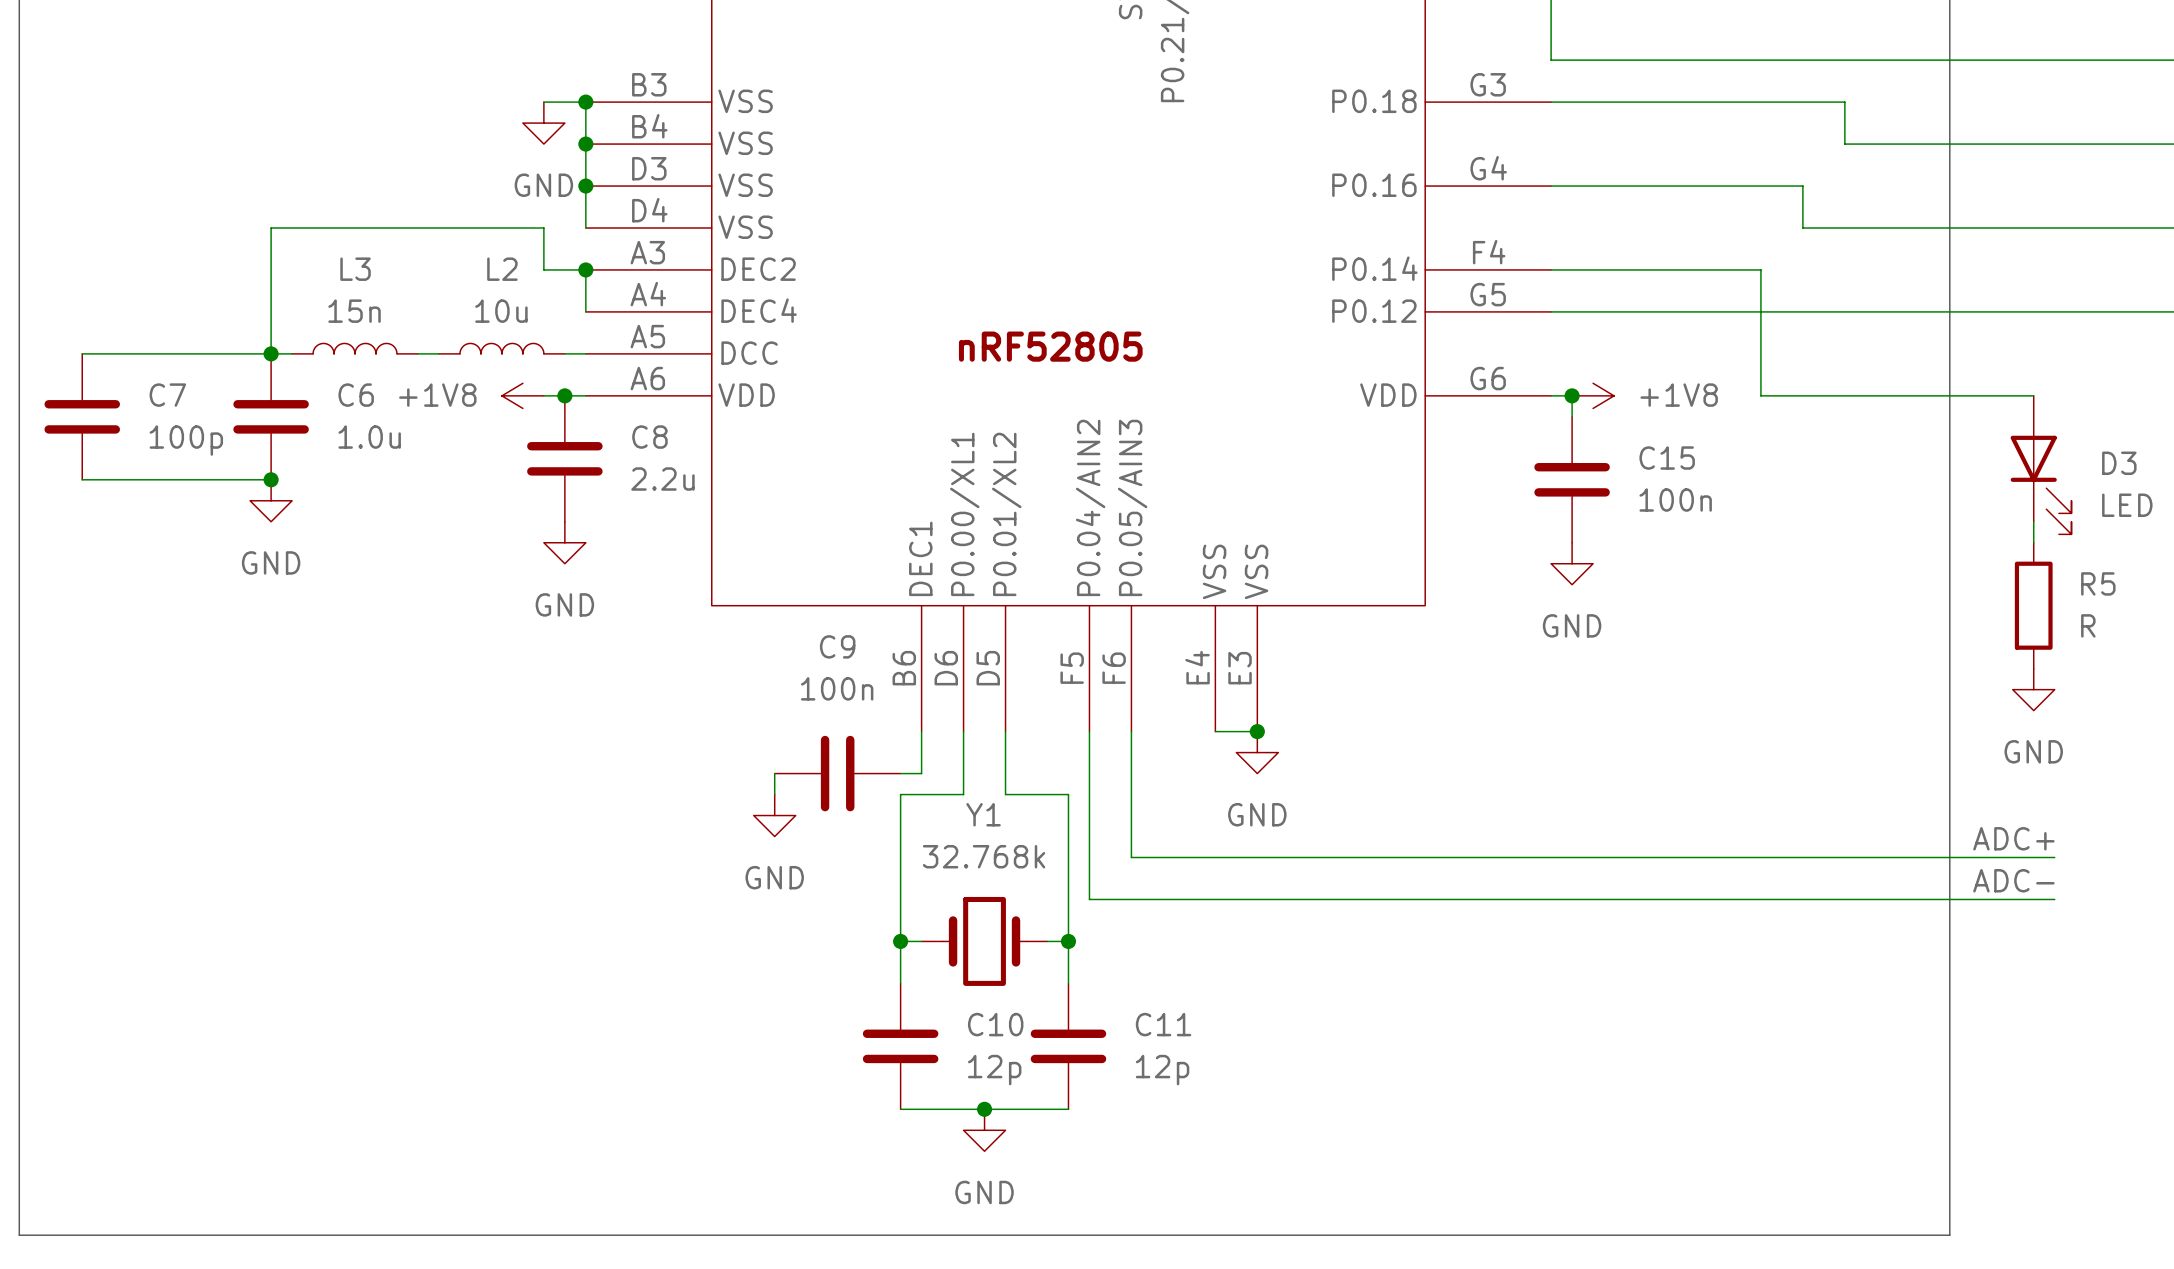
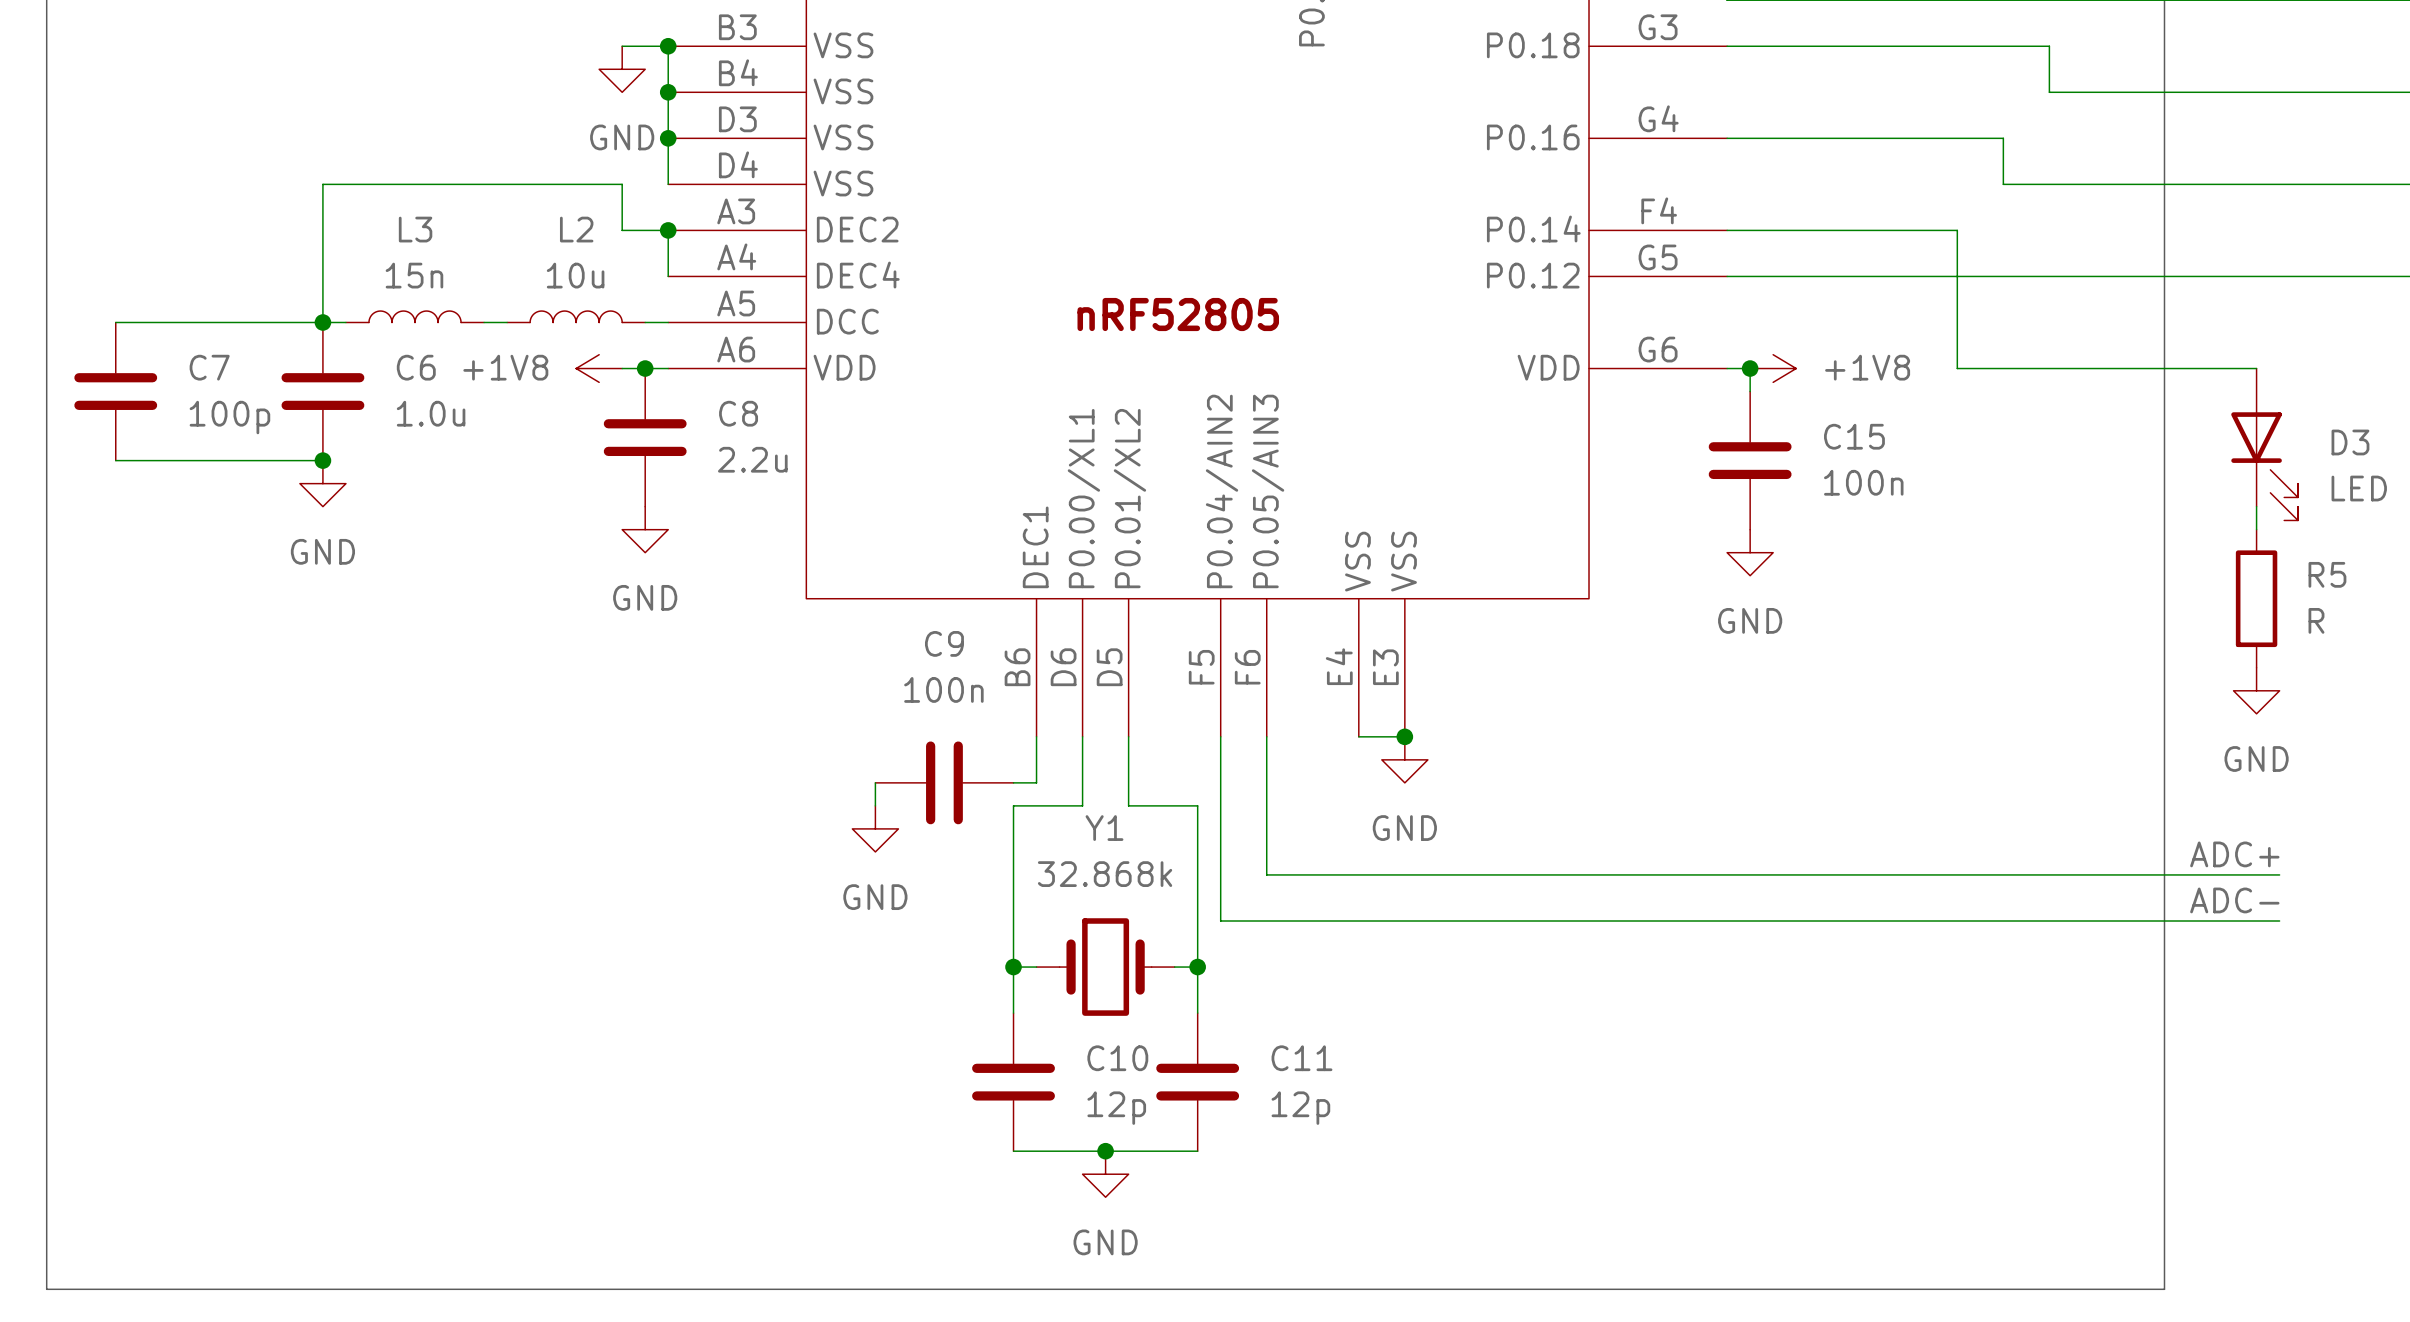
Y1 value: 32.768k (984, 856) -> 32.868k (1105, 874)

